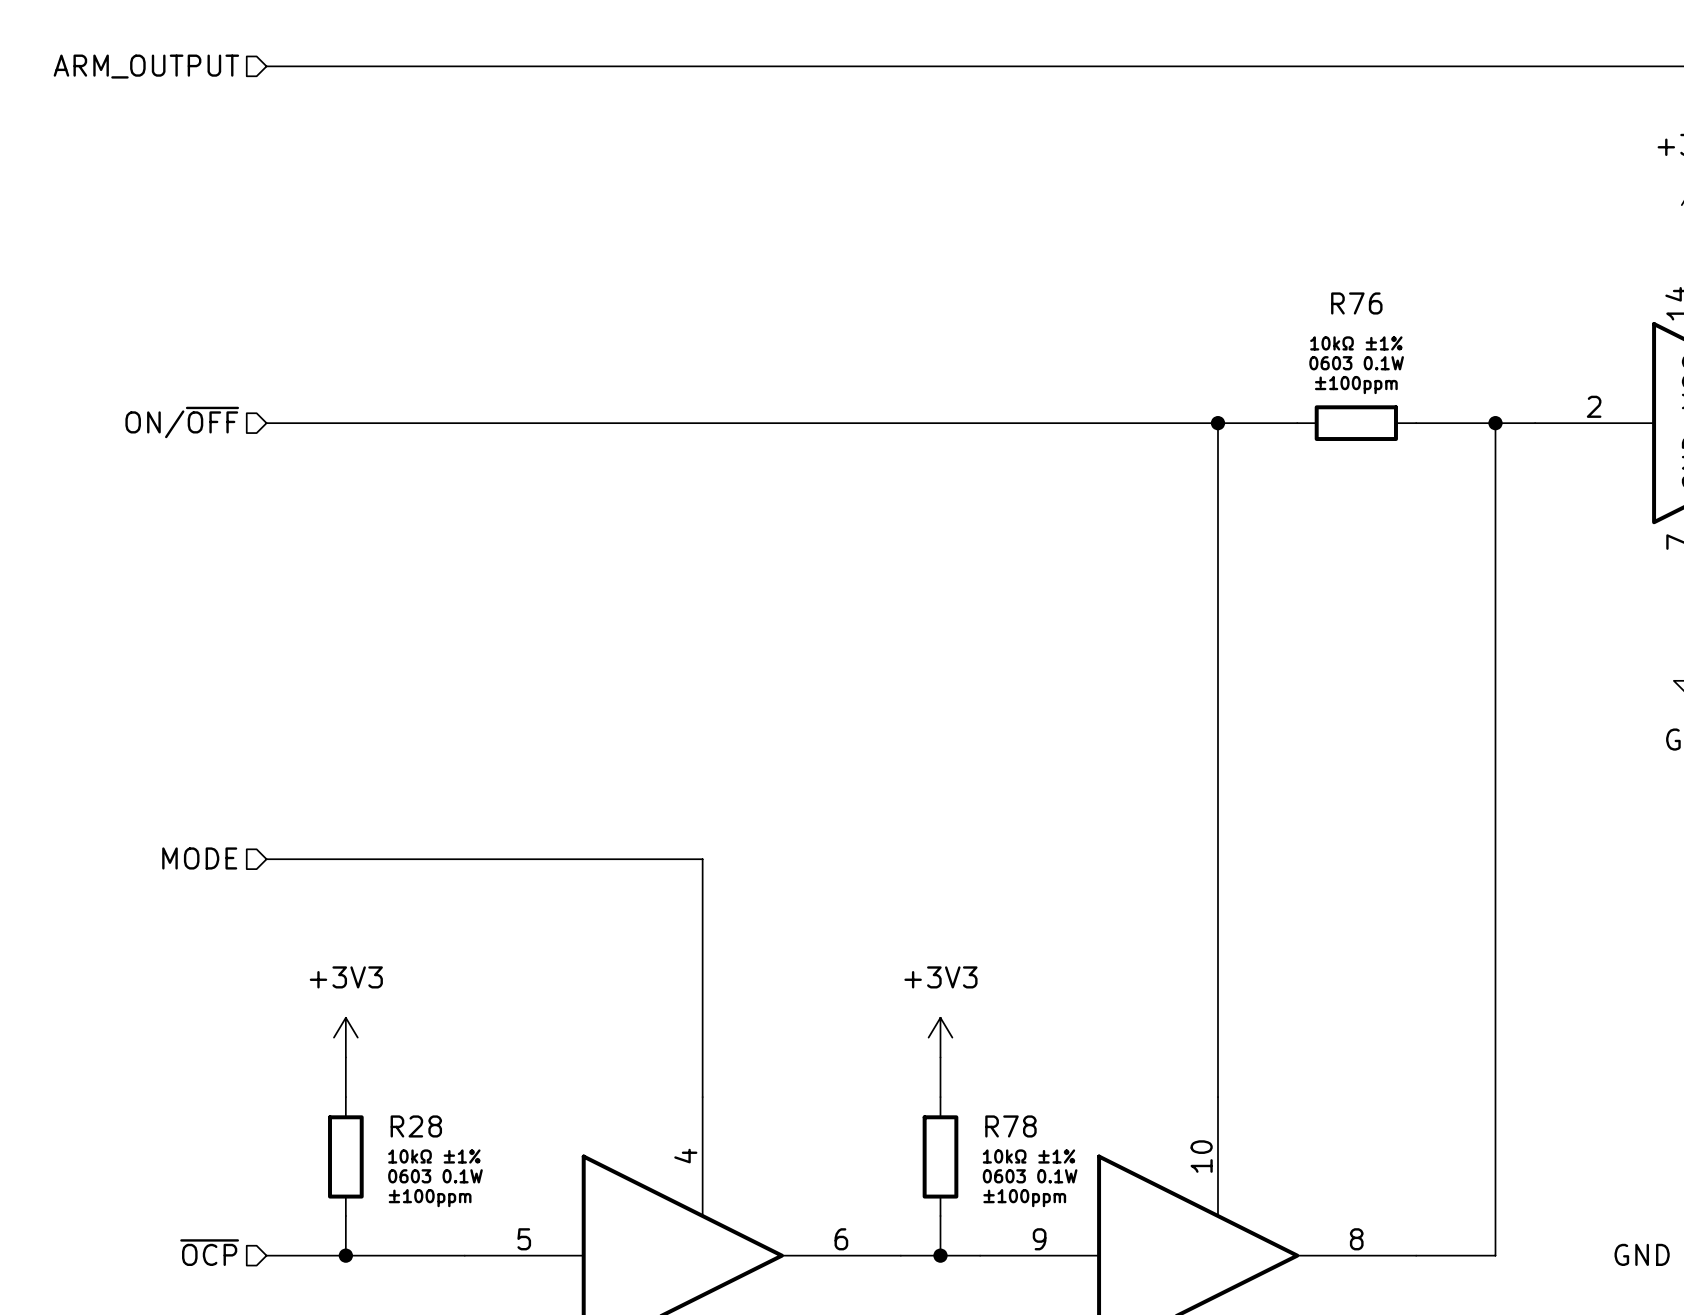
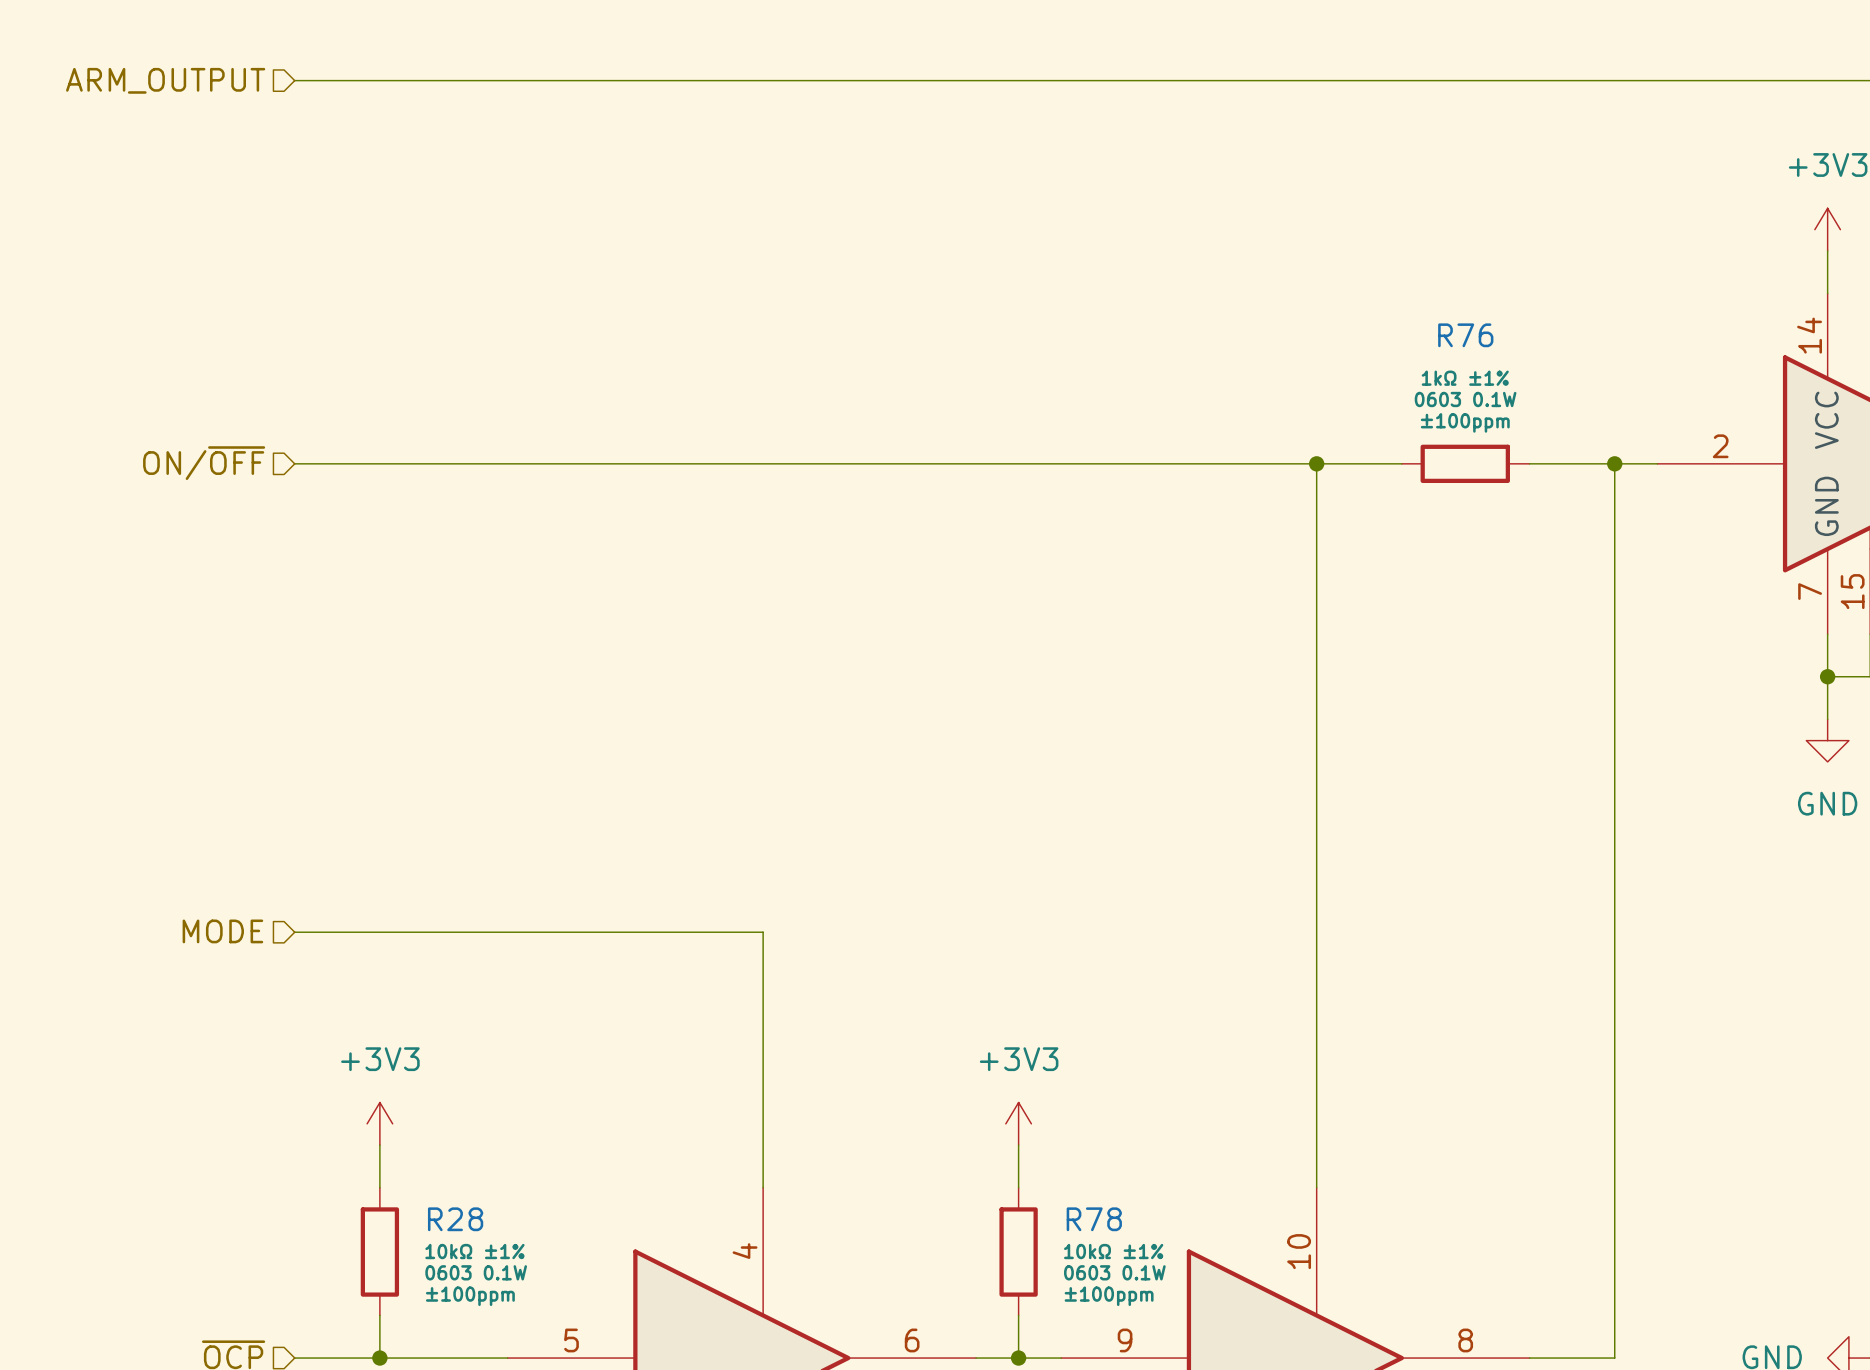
R76 text: 10kΩ ±1% (1356, 343) -> 1kΩ ±1% (1465, 378)

